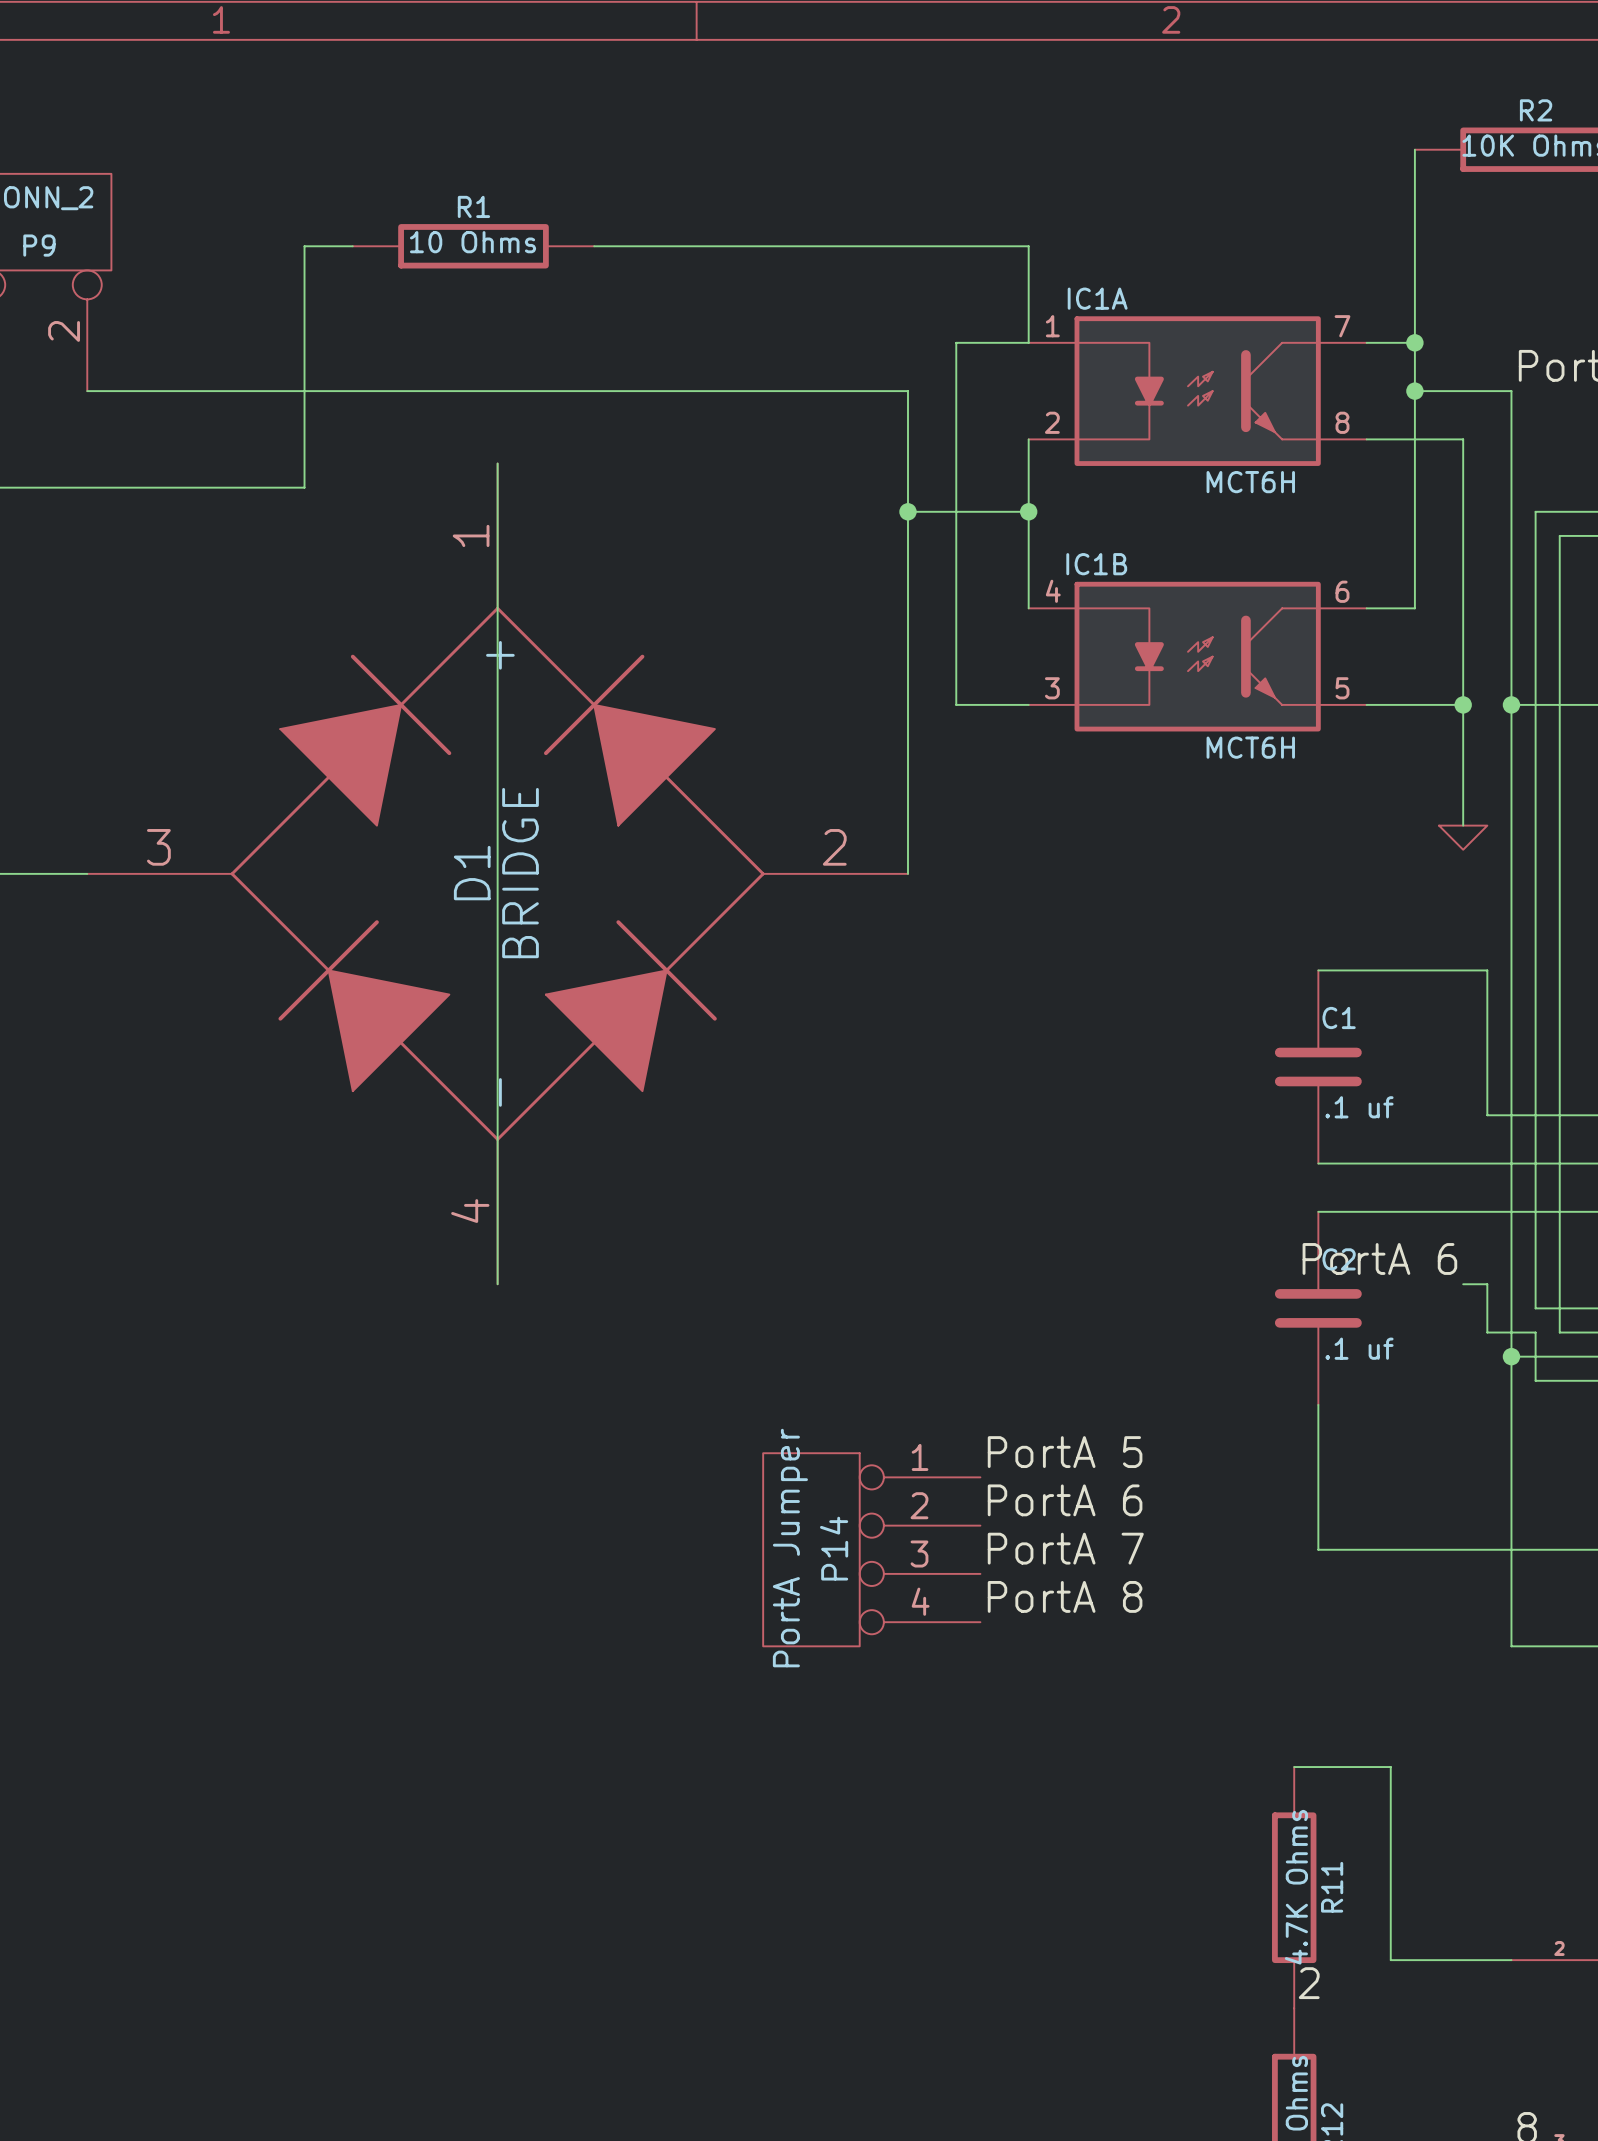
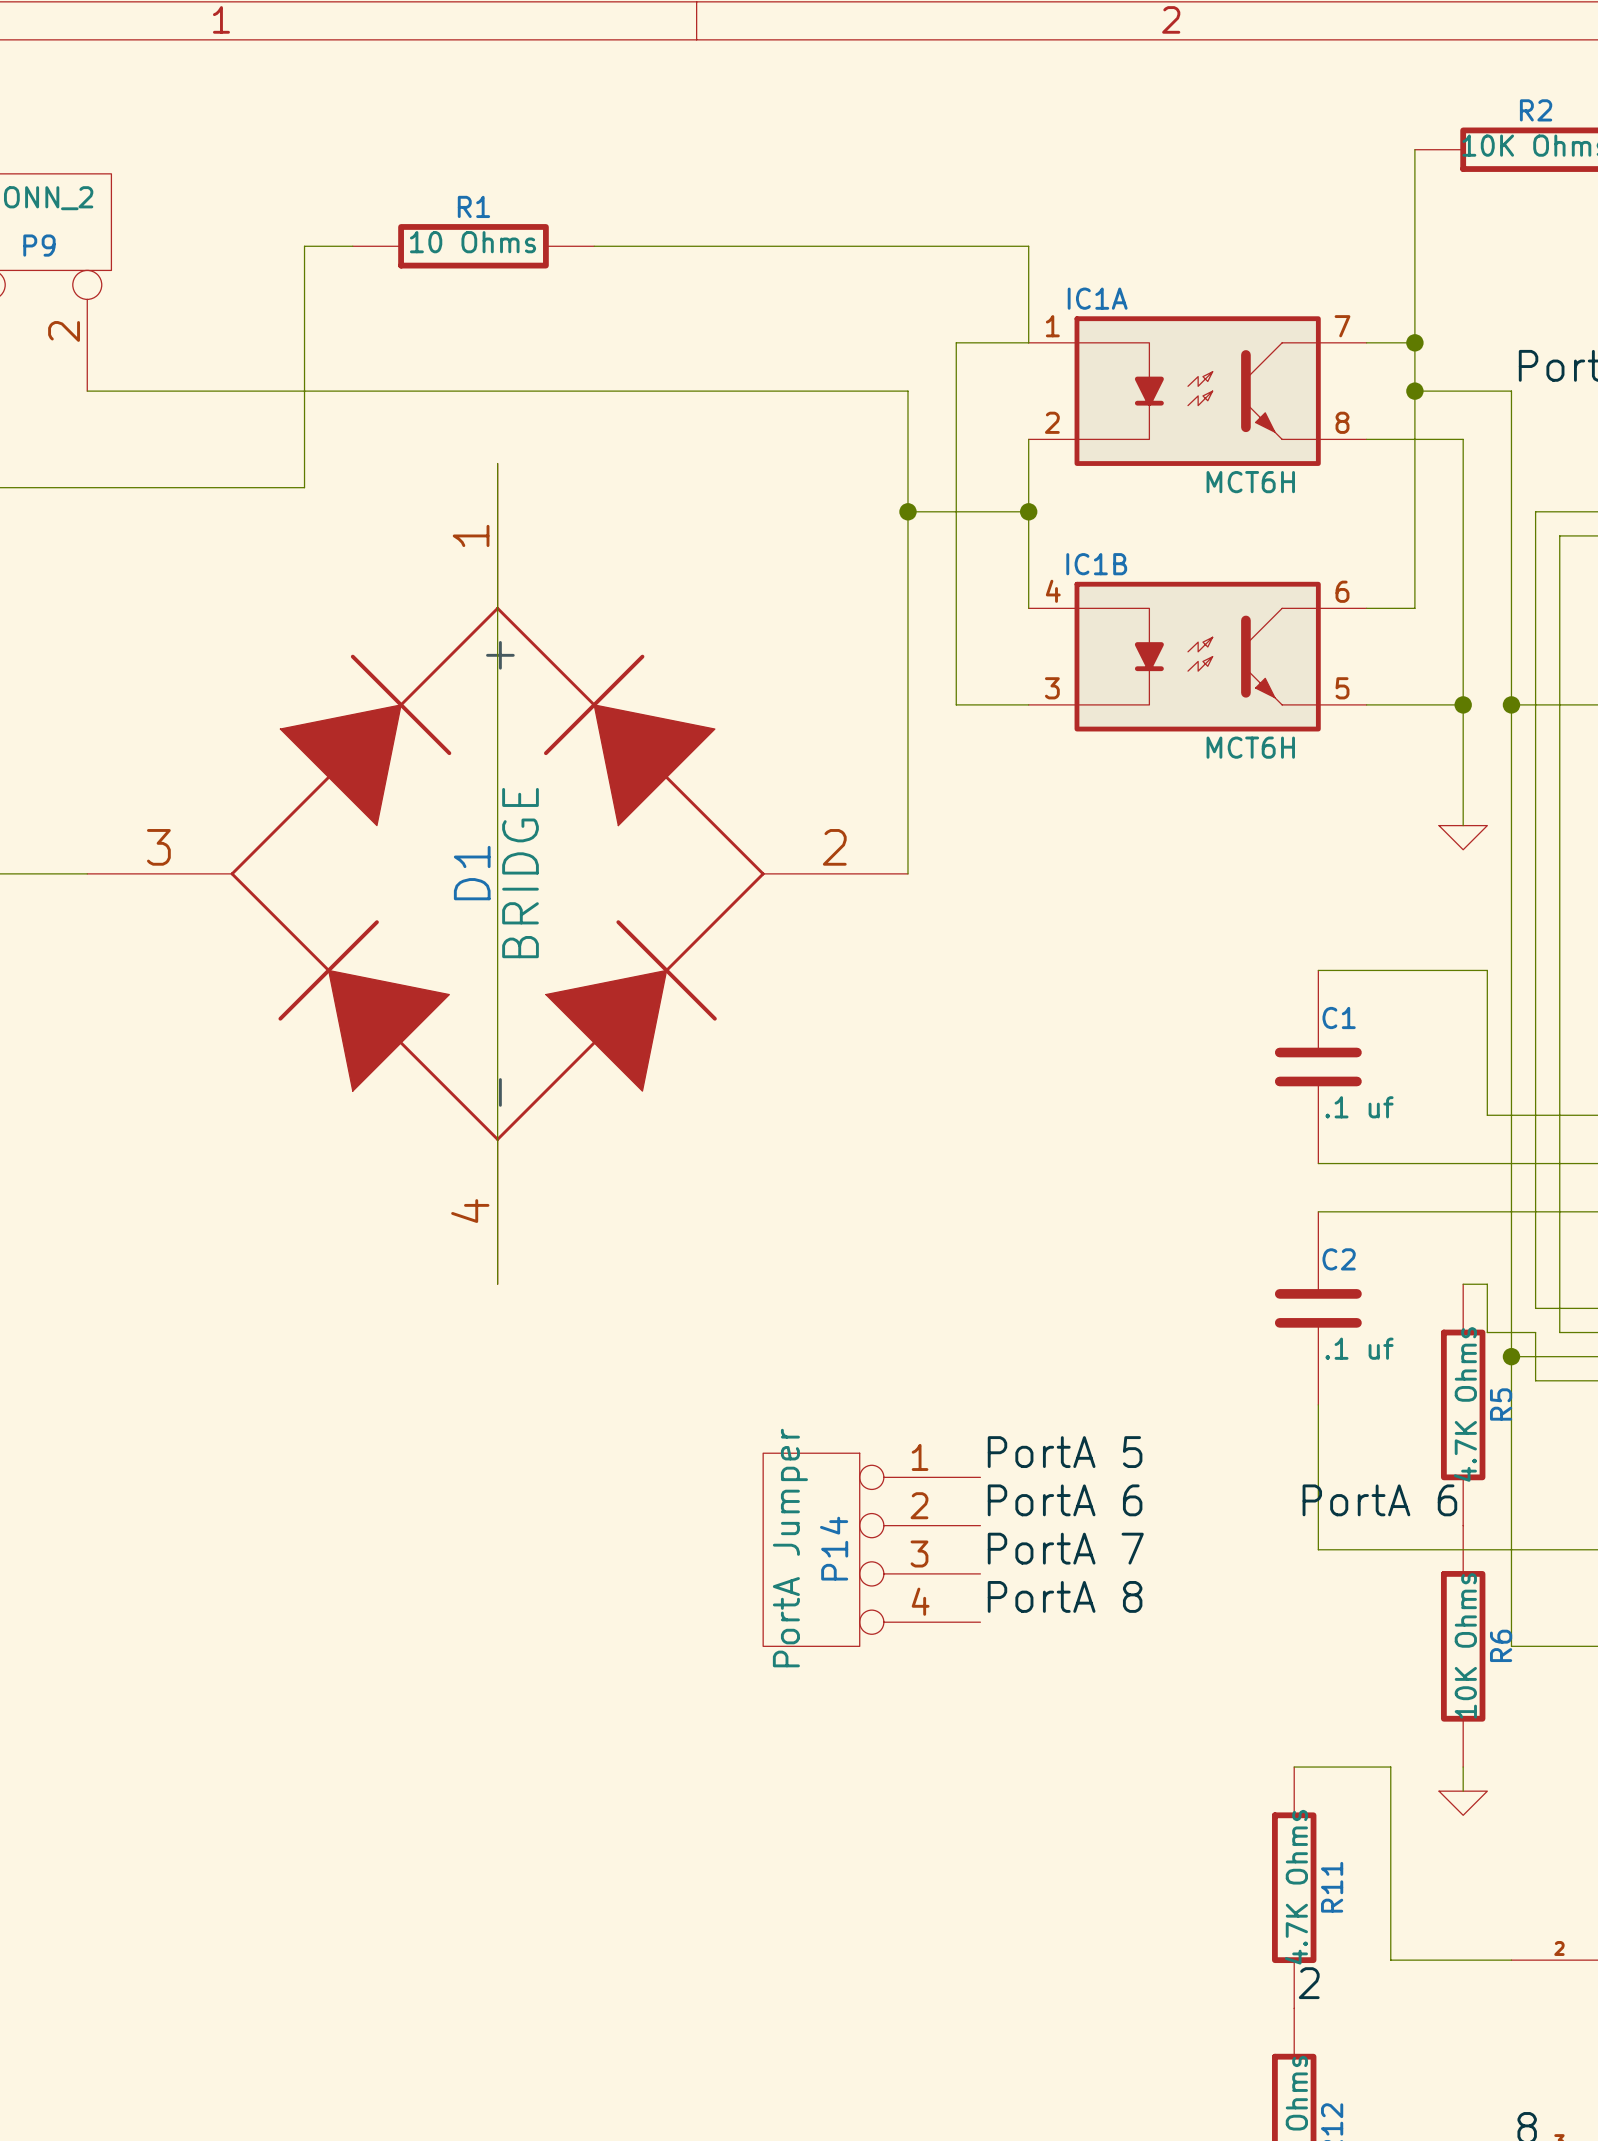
label position: PortA 6 (1379, 1258) -> PortA 6 (1379, 1500)
R5: none -> 4.7K Ohms (1463, 1404)
R6: none -> 10K Ohms (1463, 1646)
wire: none -> (1463, 1767) (1463, 1791)
power symbol: none -> (1463, 1803)

